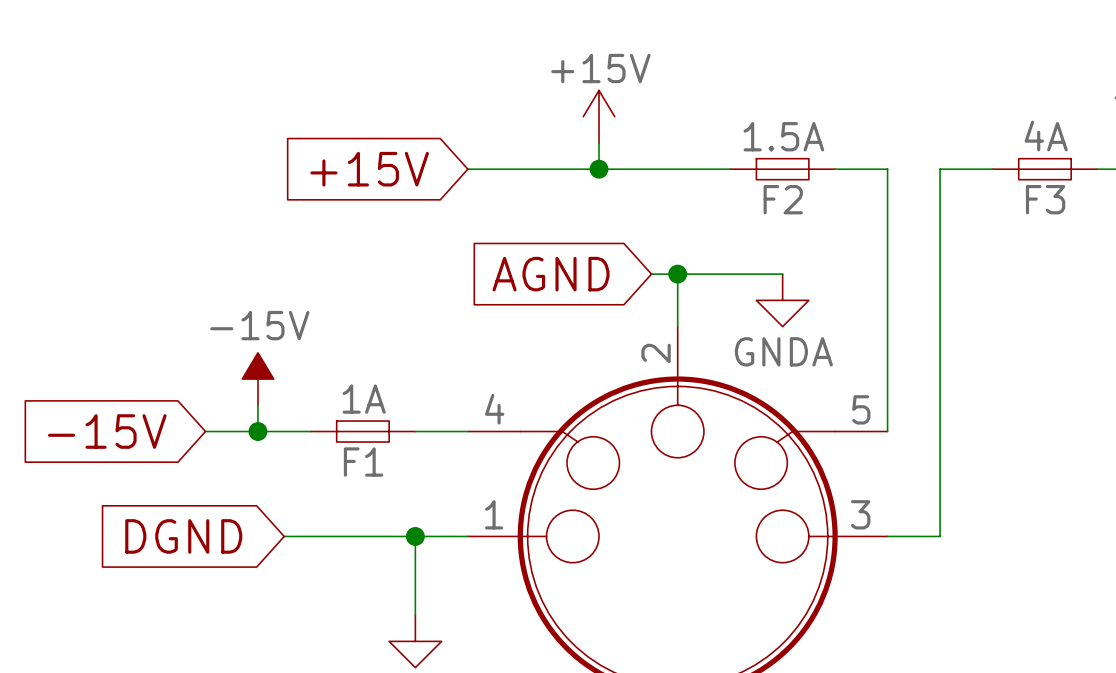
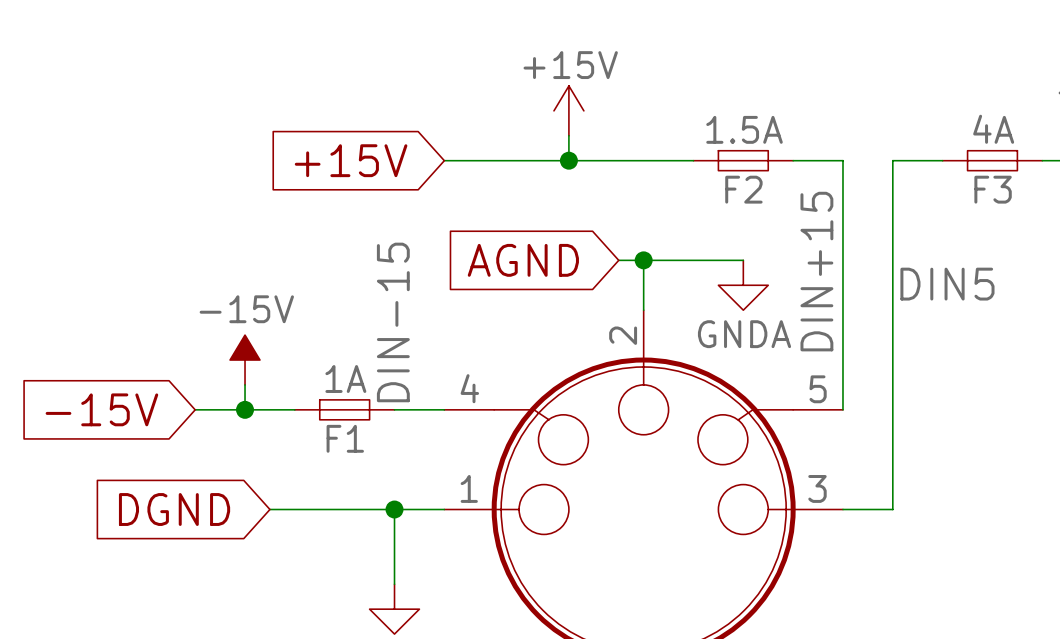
label: none -> DIN+15 (816, 271)
label: none -> DIN5 (947, 284)
label: none -> DIN-15 (393, 322)

